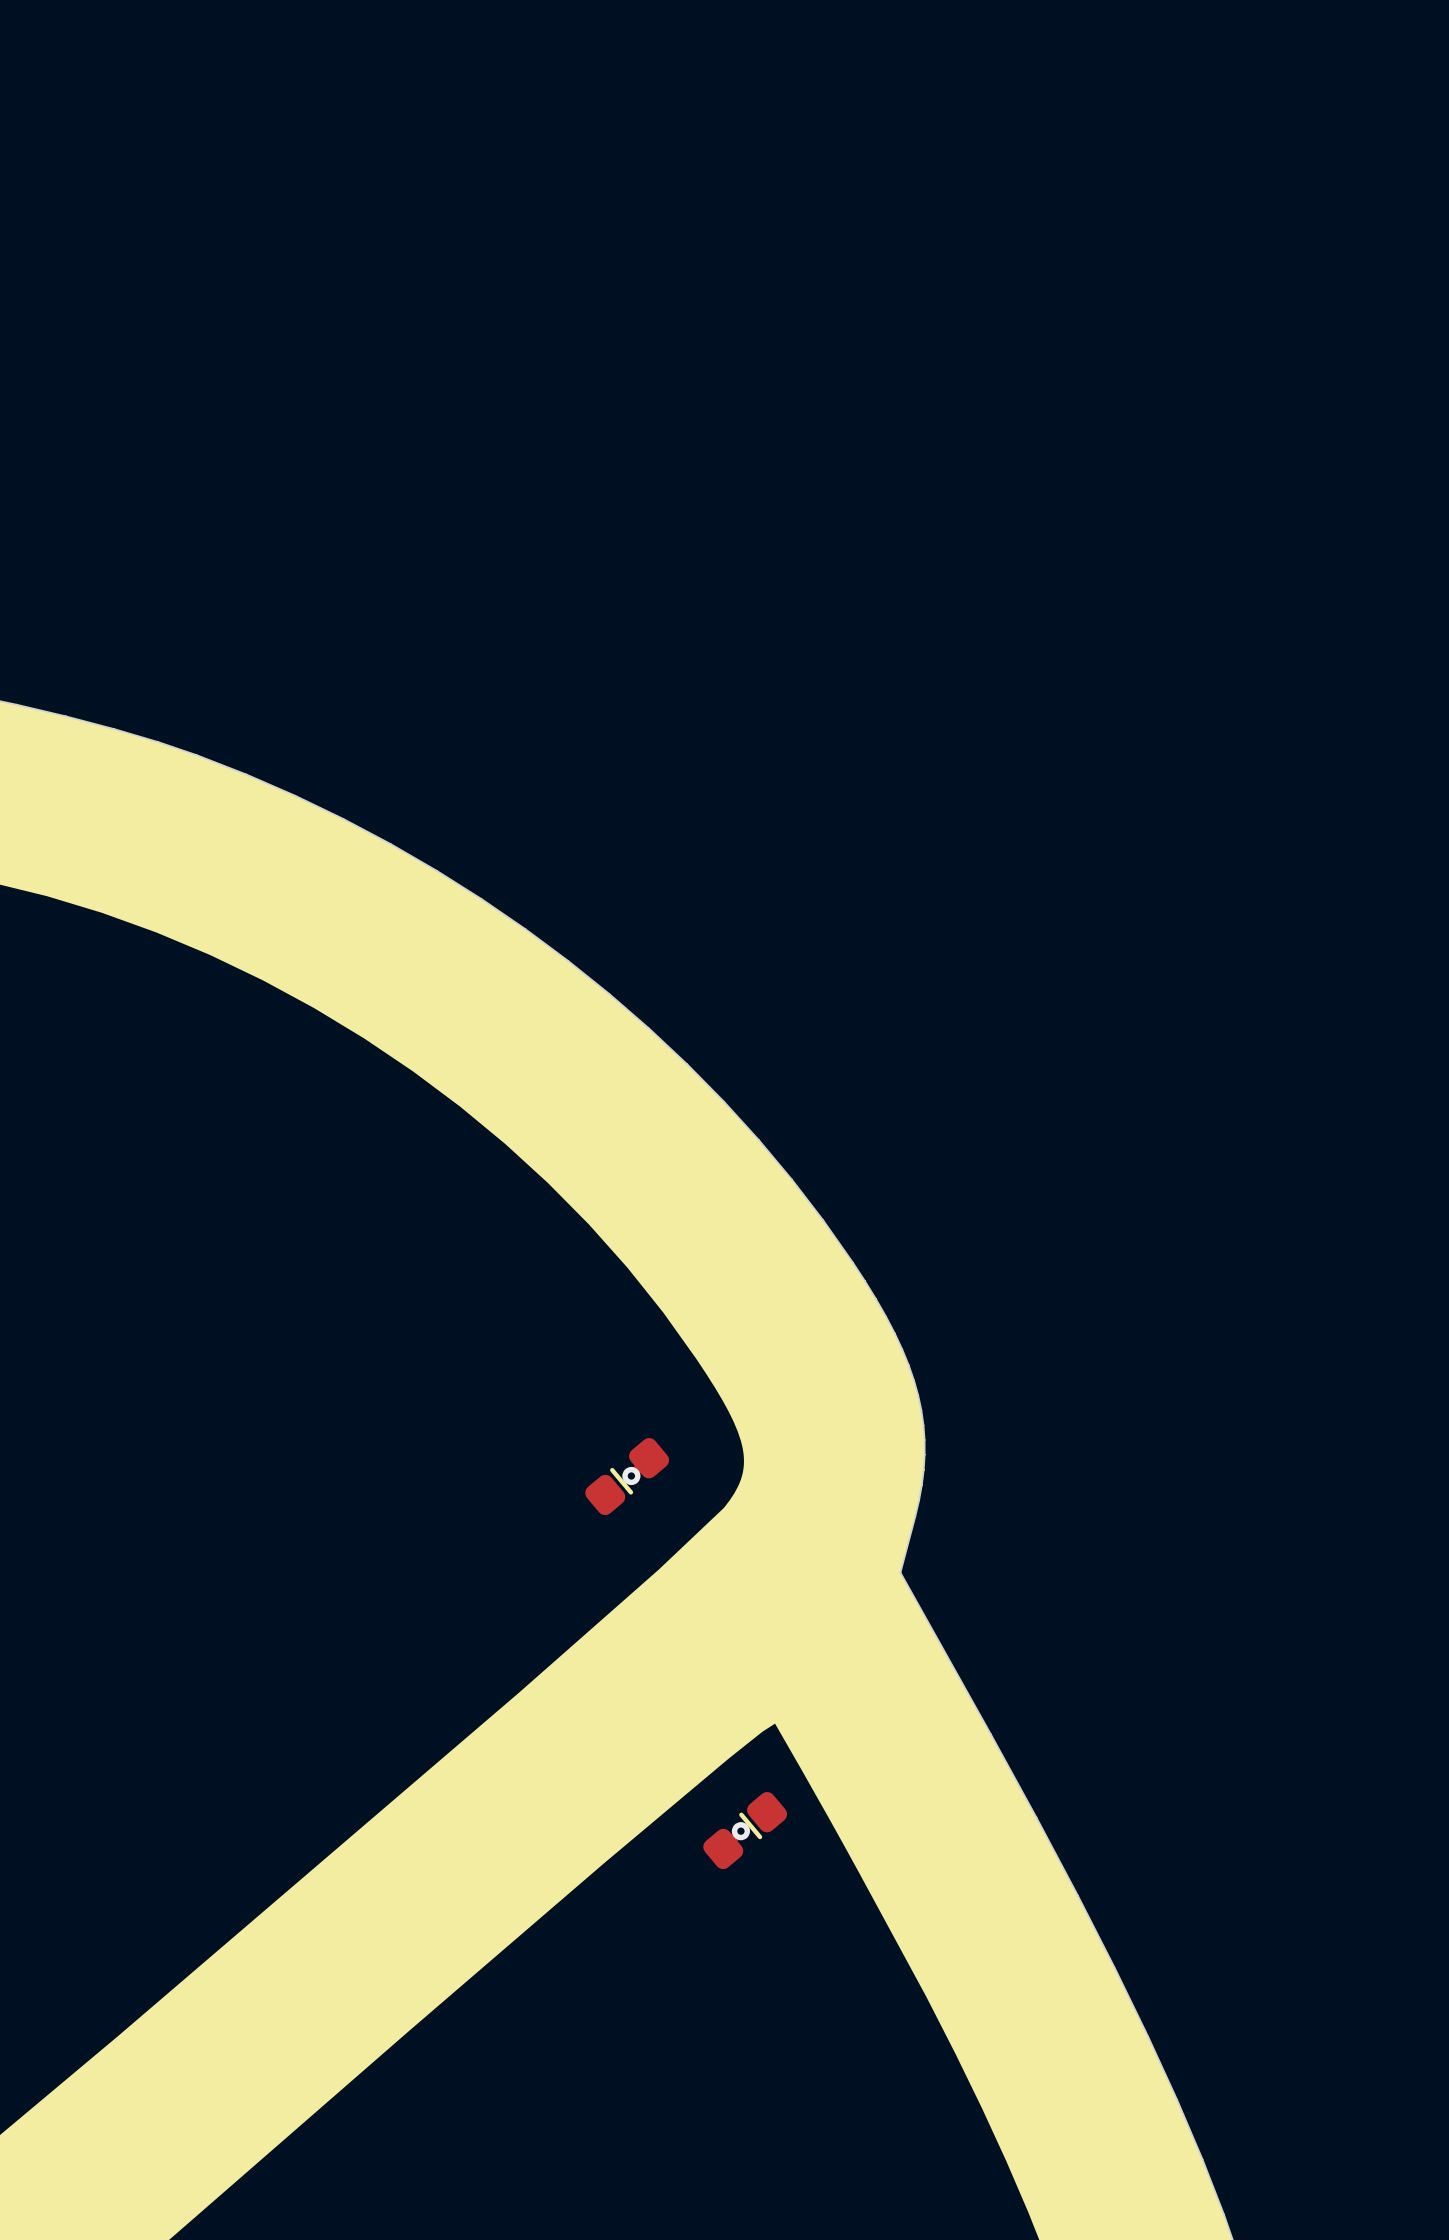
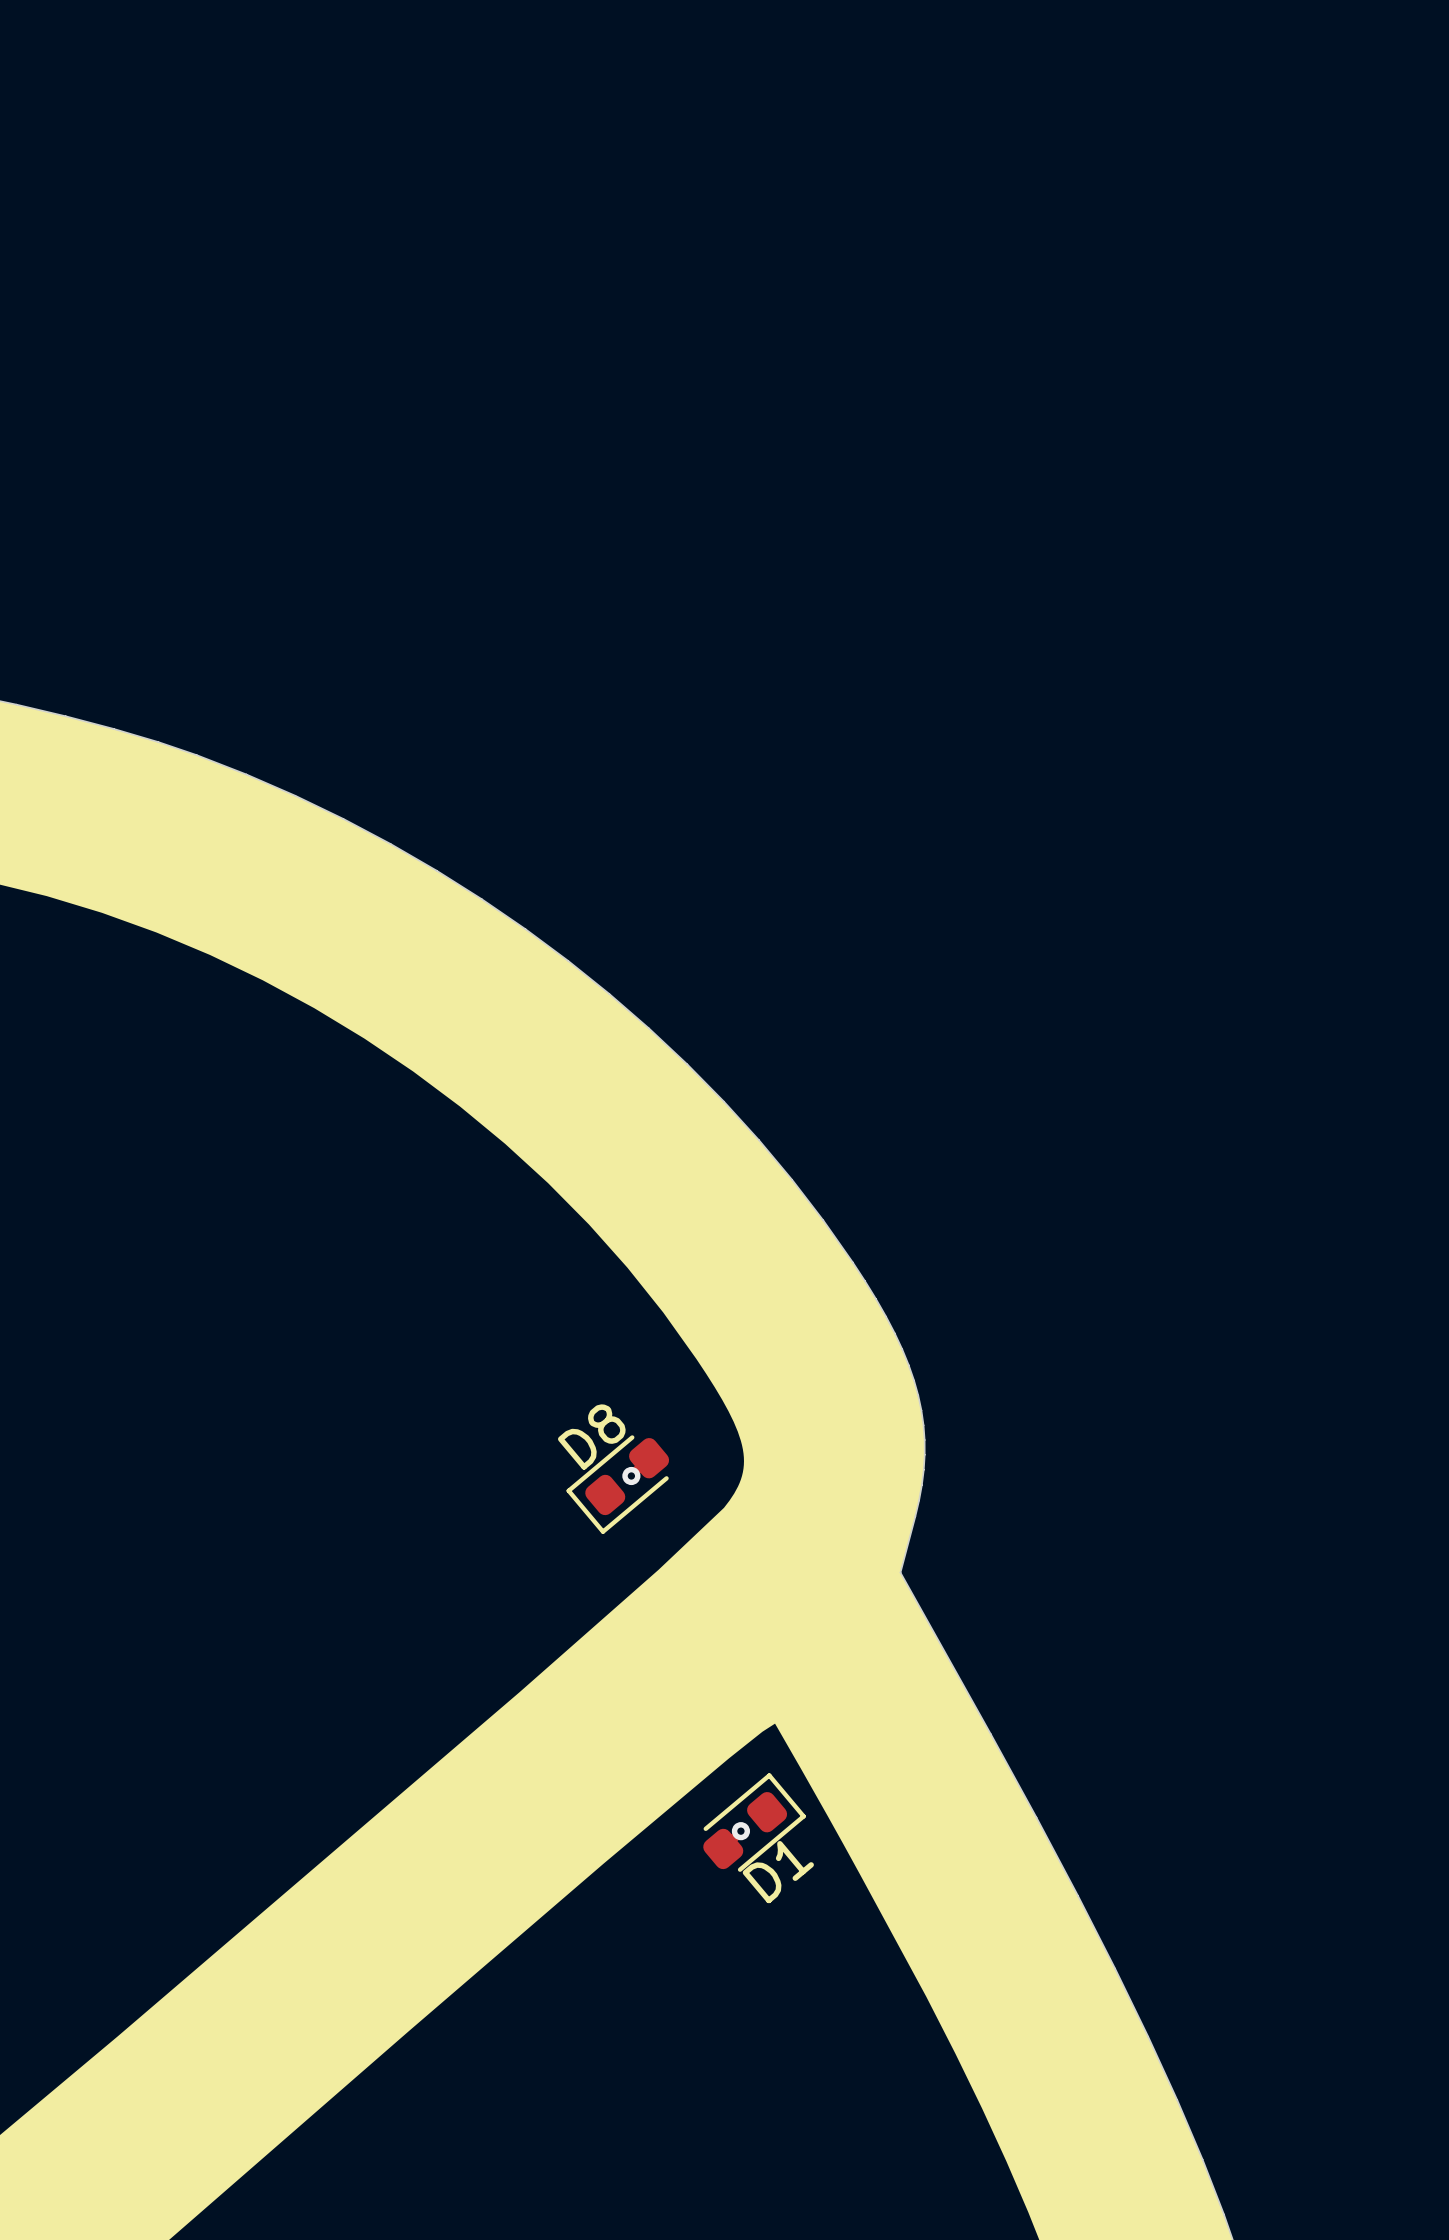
part: (627, 1476) -> none
D8: none -> (617, 1484)
D1: none -> (754, 1822)
part: (745, 1830) -> none

